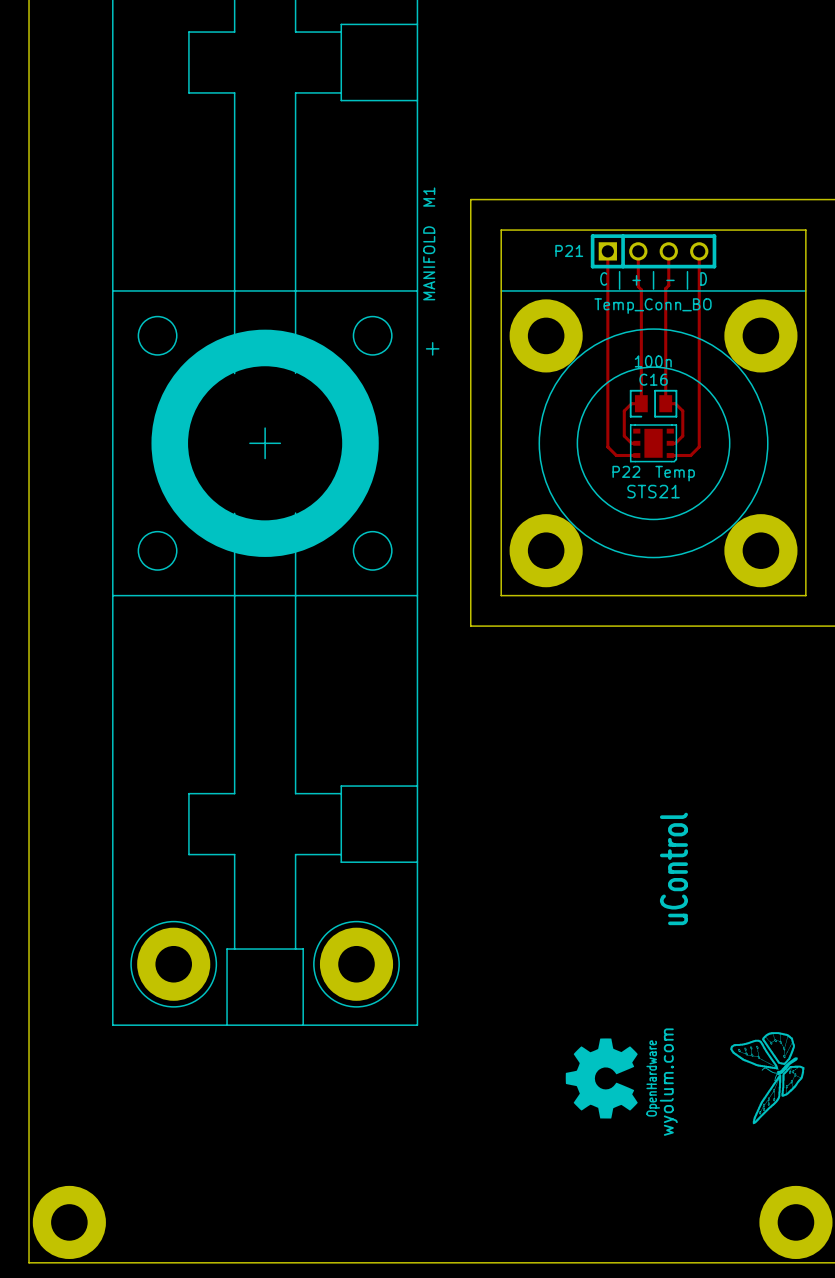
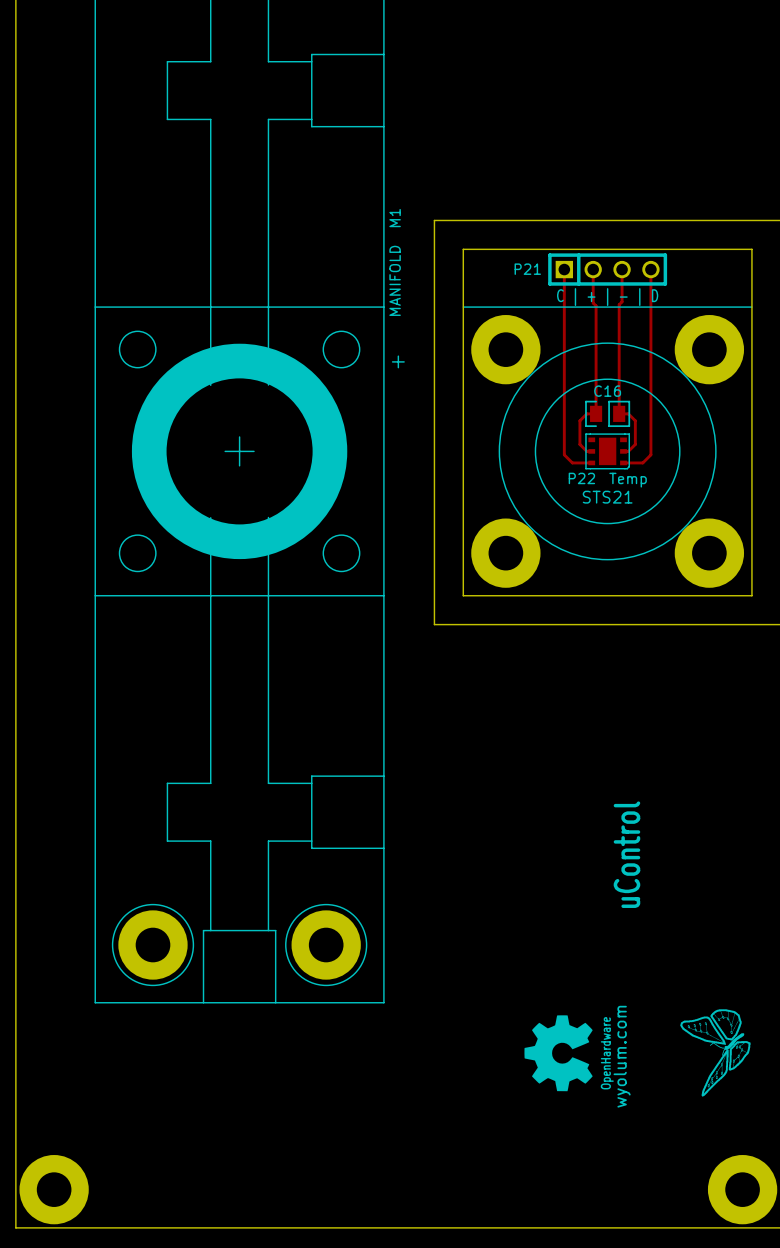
P21 value: Temp_Conn_BO (653, 306) -> none
C16 value: 100n (653, 361) -> none

